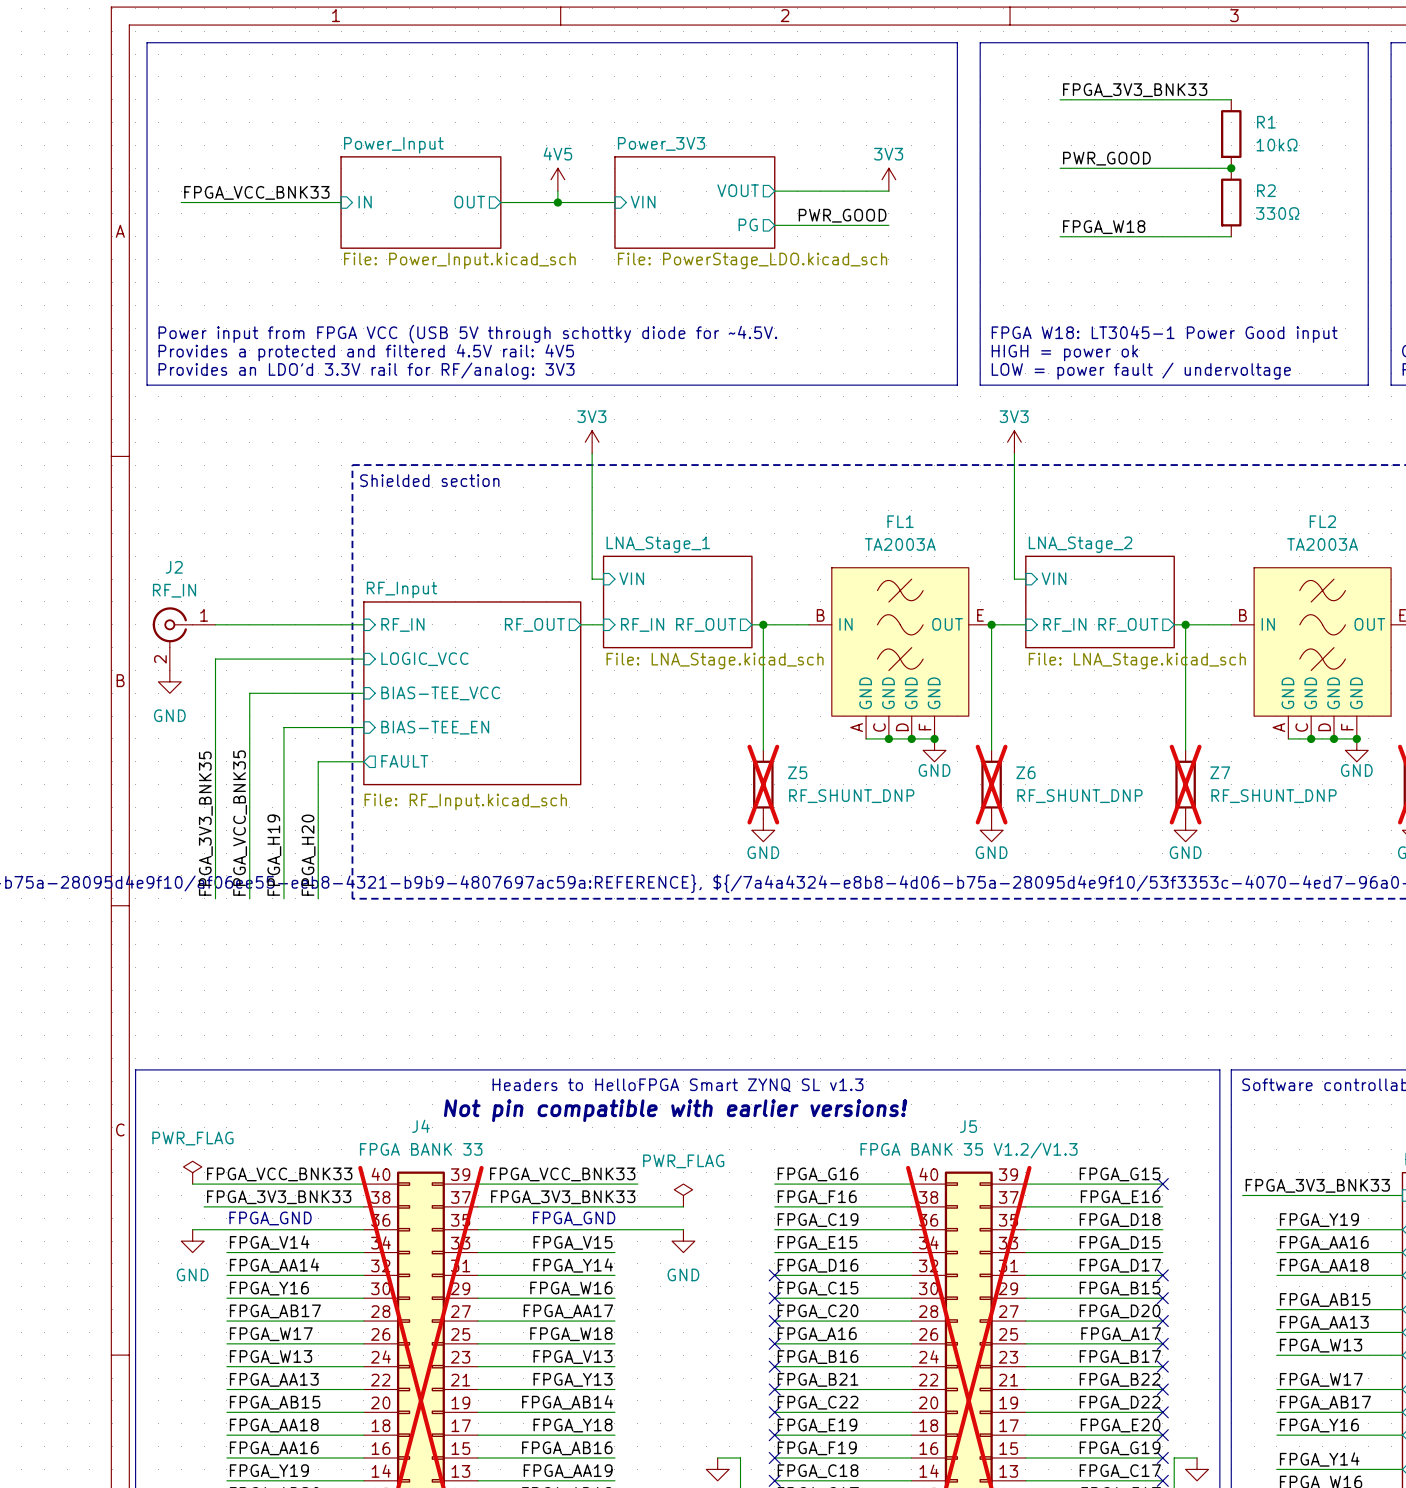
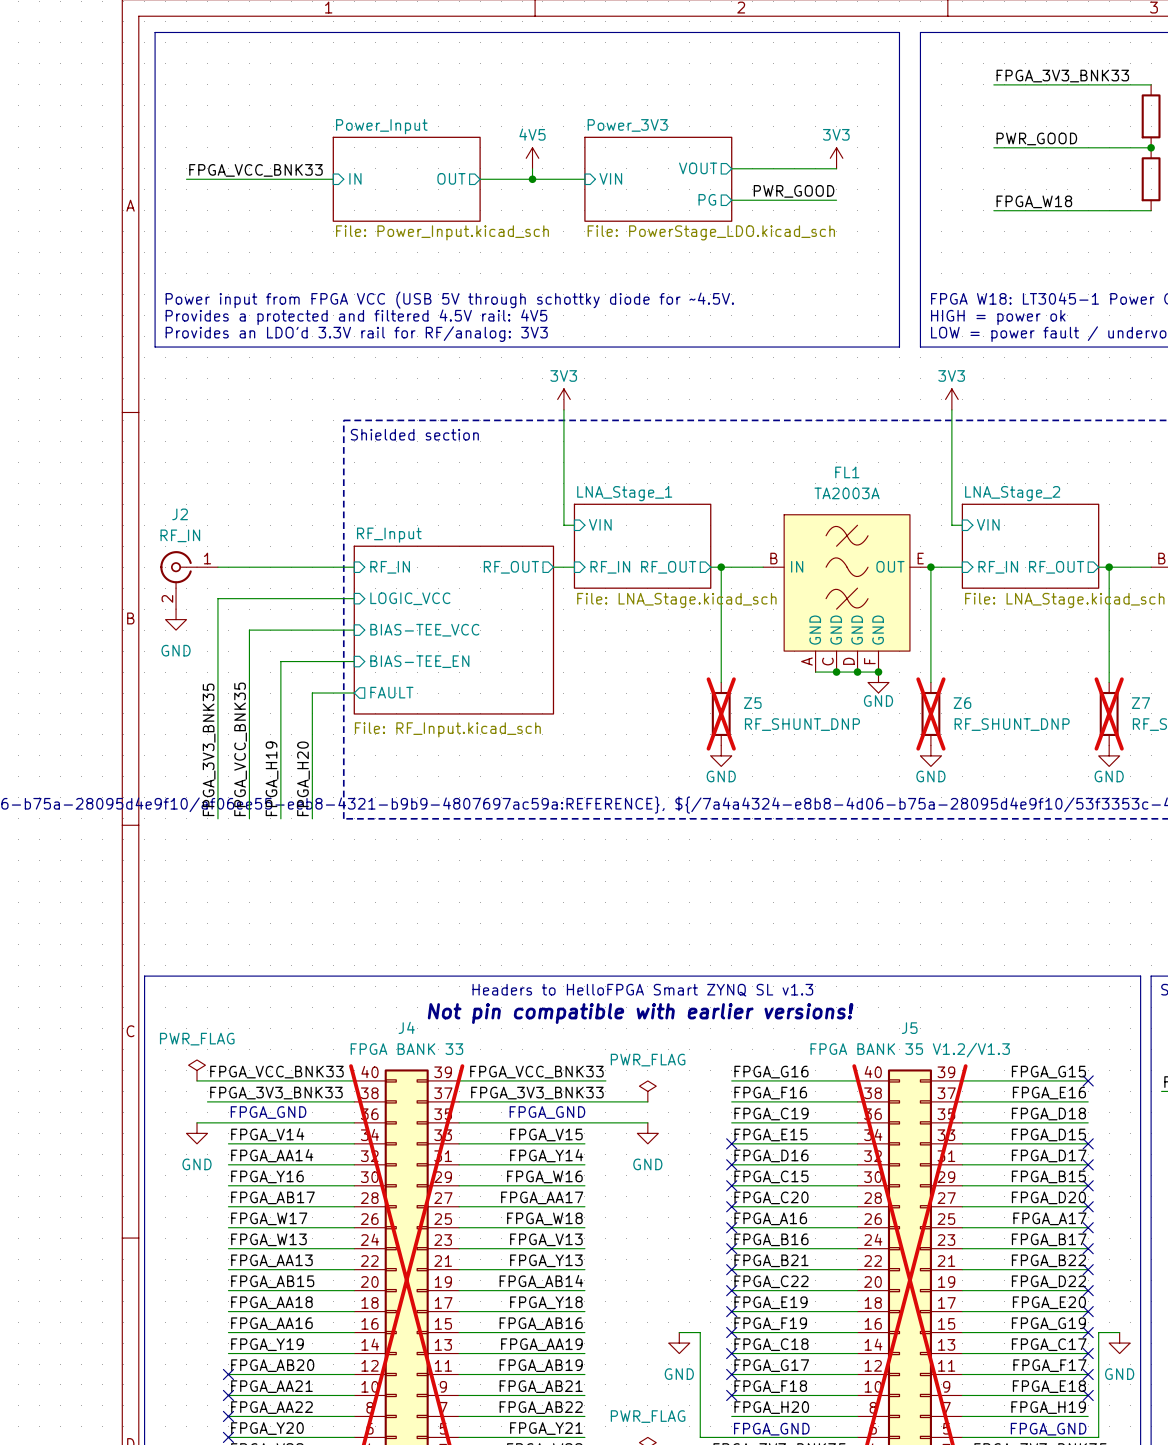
no-connect mark: none -> (731, 1143)
no-connect mark: none -> (1088, 1143)

